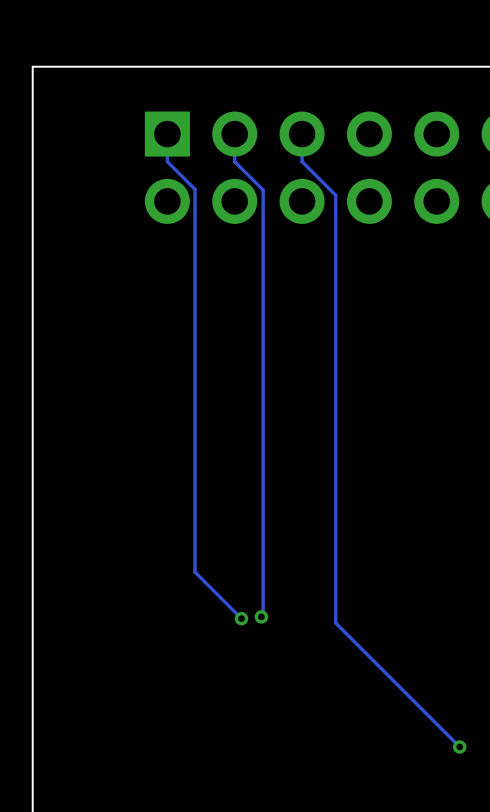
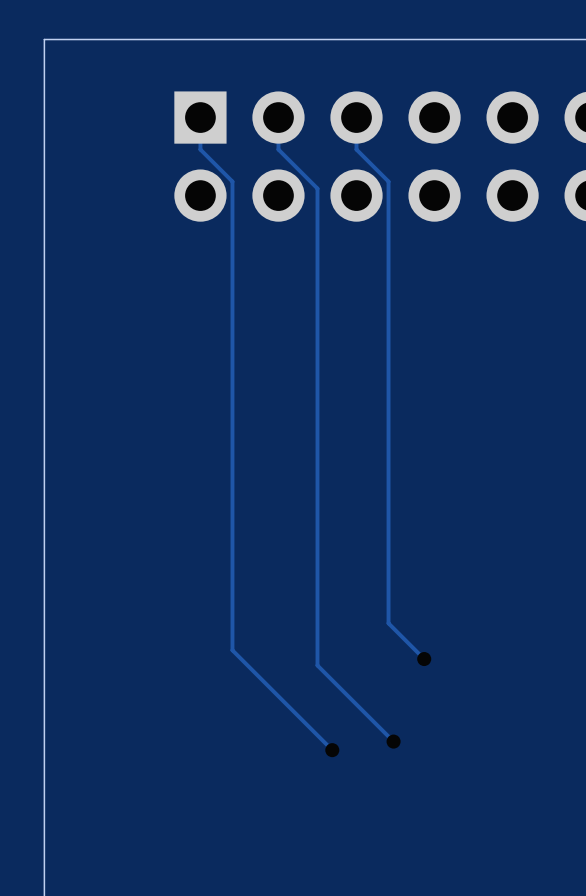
track: (329, 189) (335, 195) (335, 623) (459, 746) -> (388, 181) (388, 623) (424, 659)
track: (263, 190) (263, 615) (261, 616) -> (311, 182) (317, 188) (317, 665) (393, 741)
track: (195, 572) (241, 618) -> (232, 625) (232, 650) (332, 750)
via: none -> (424, 659)
via: (261, 616) -> none
via: (241, 618) -> none
via: none -> (393, 741)
via: none -> (332, 750)
via: (459, 746) -> none

